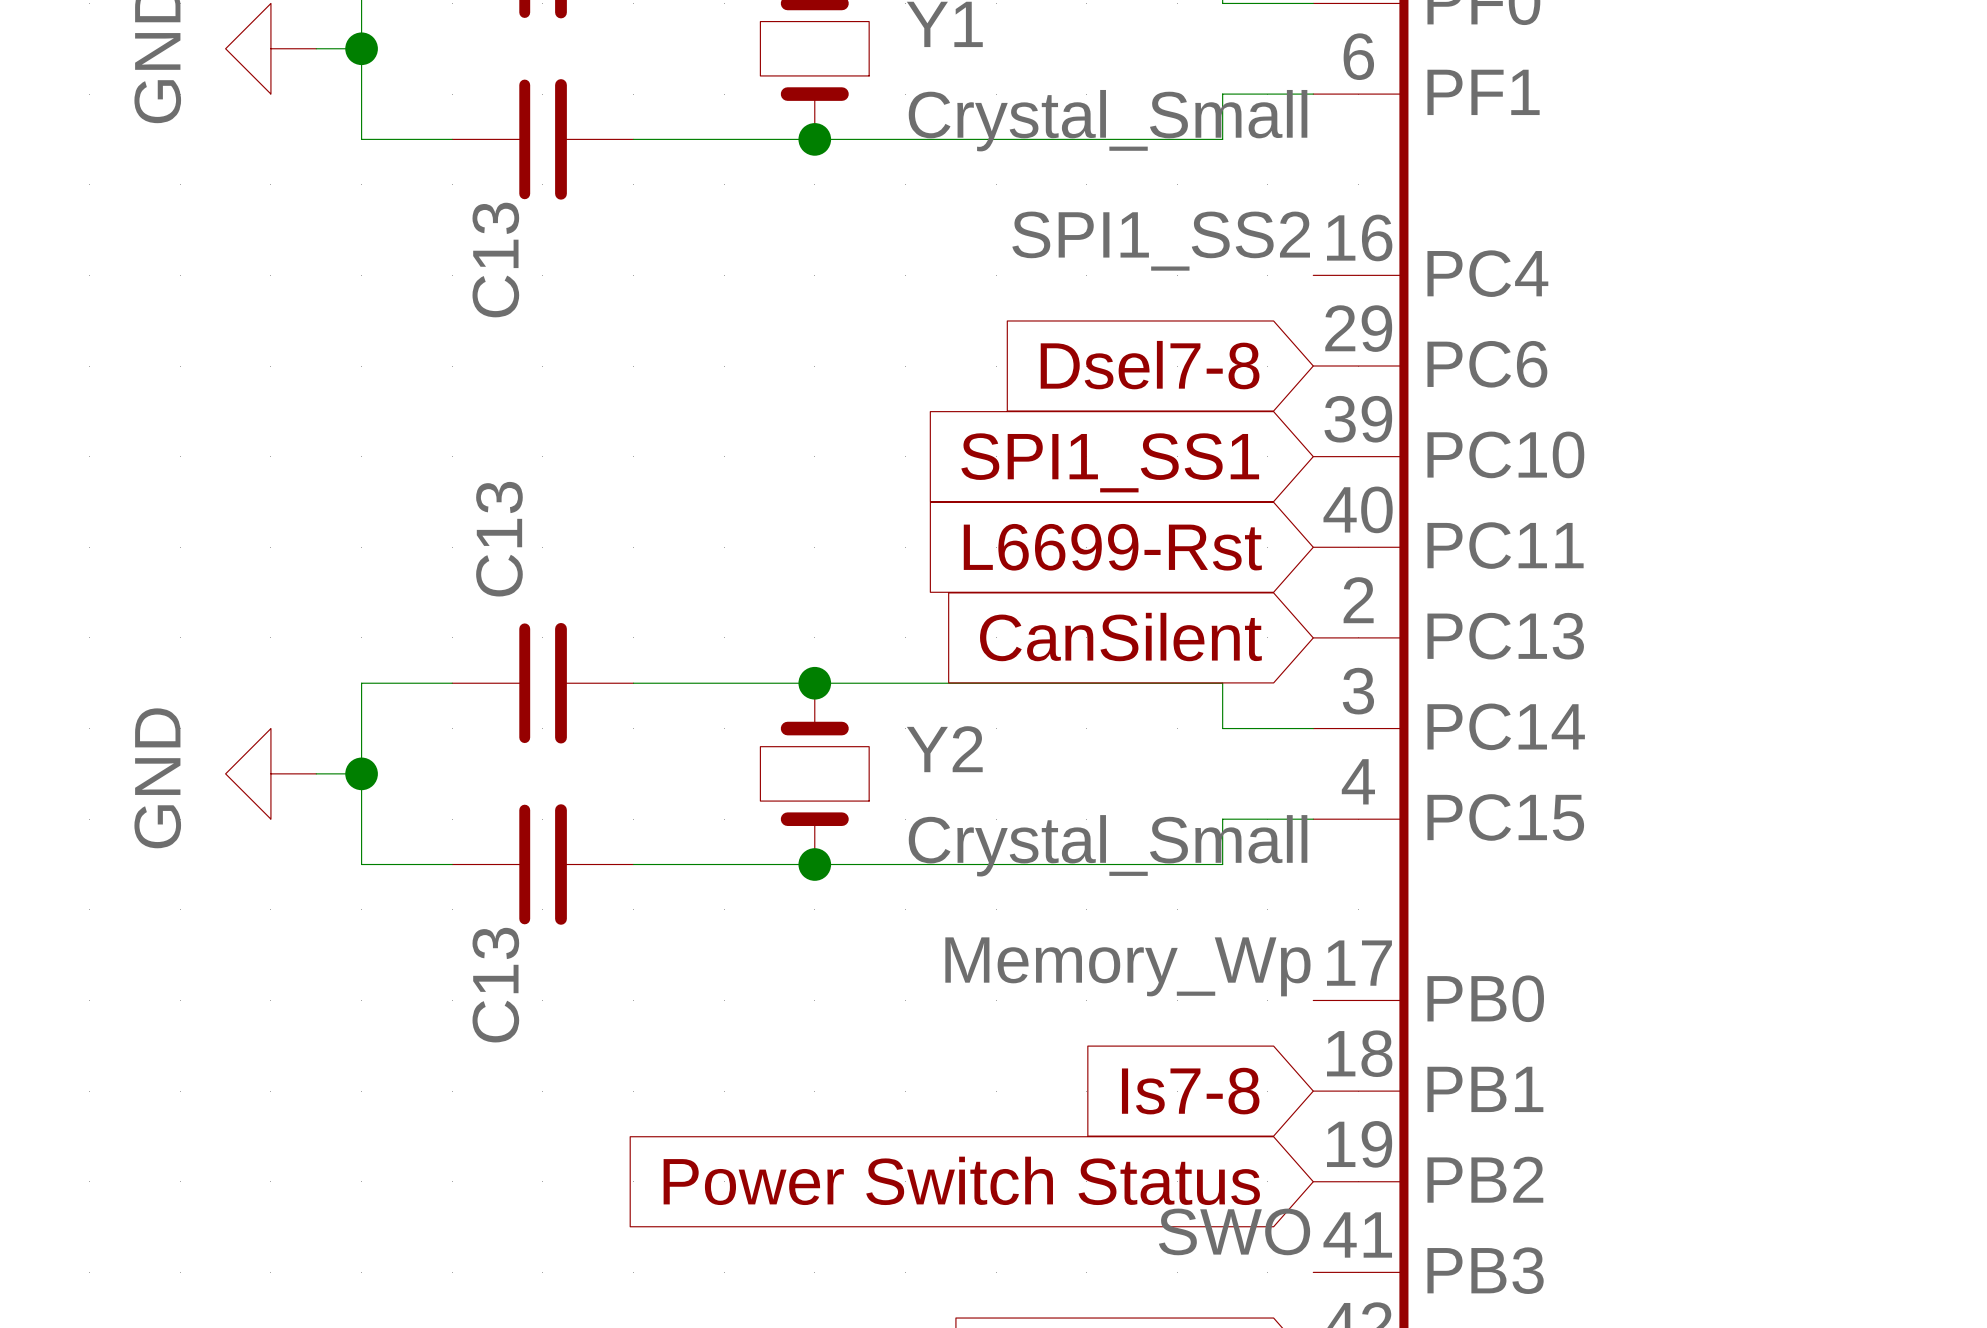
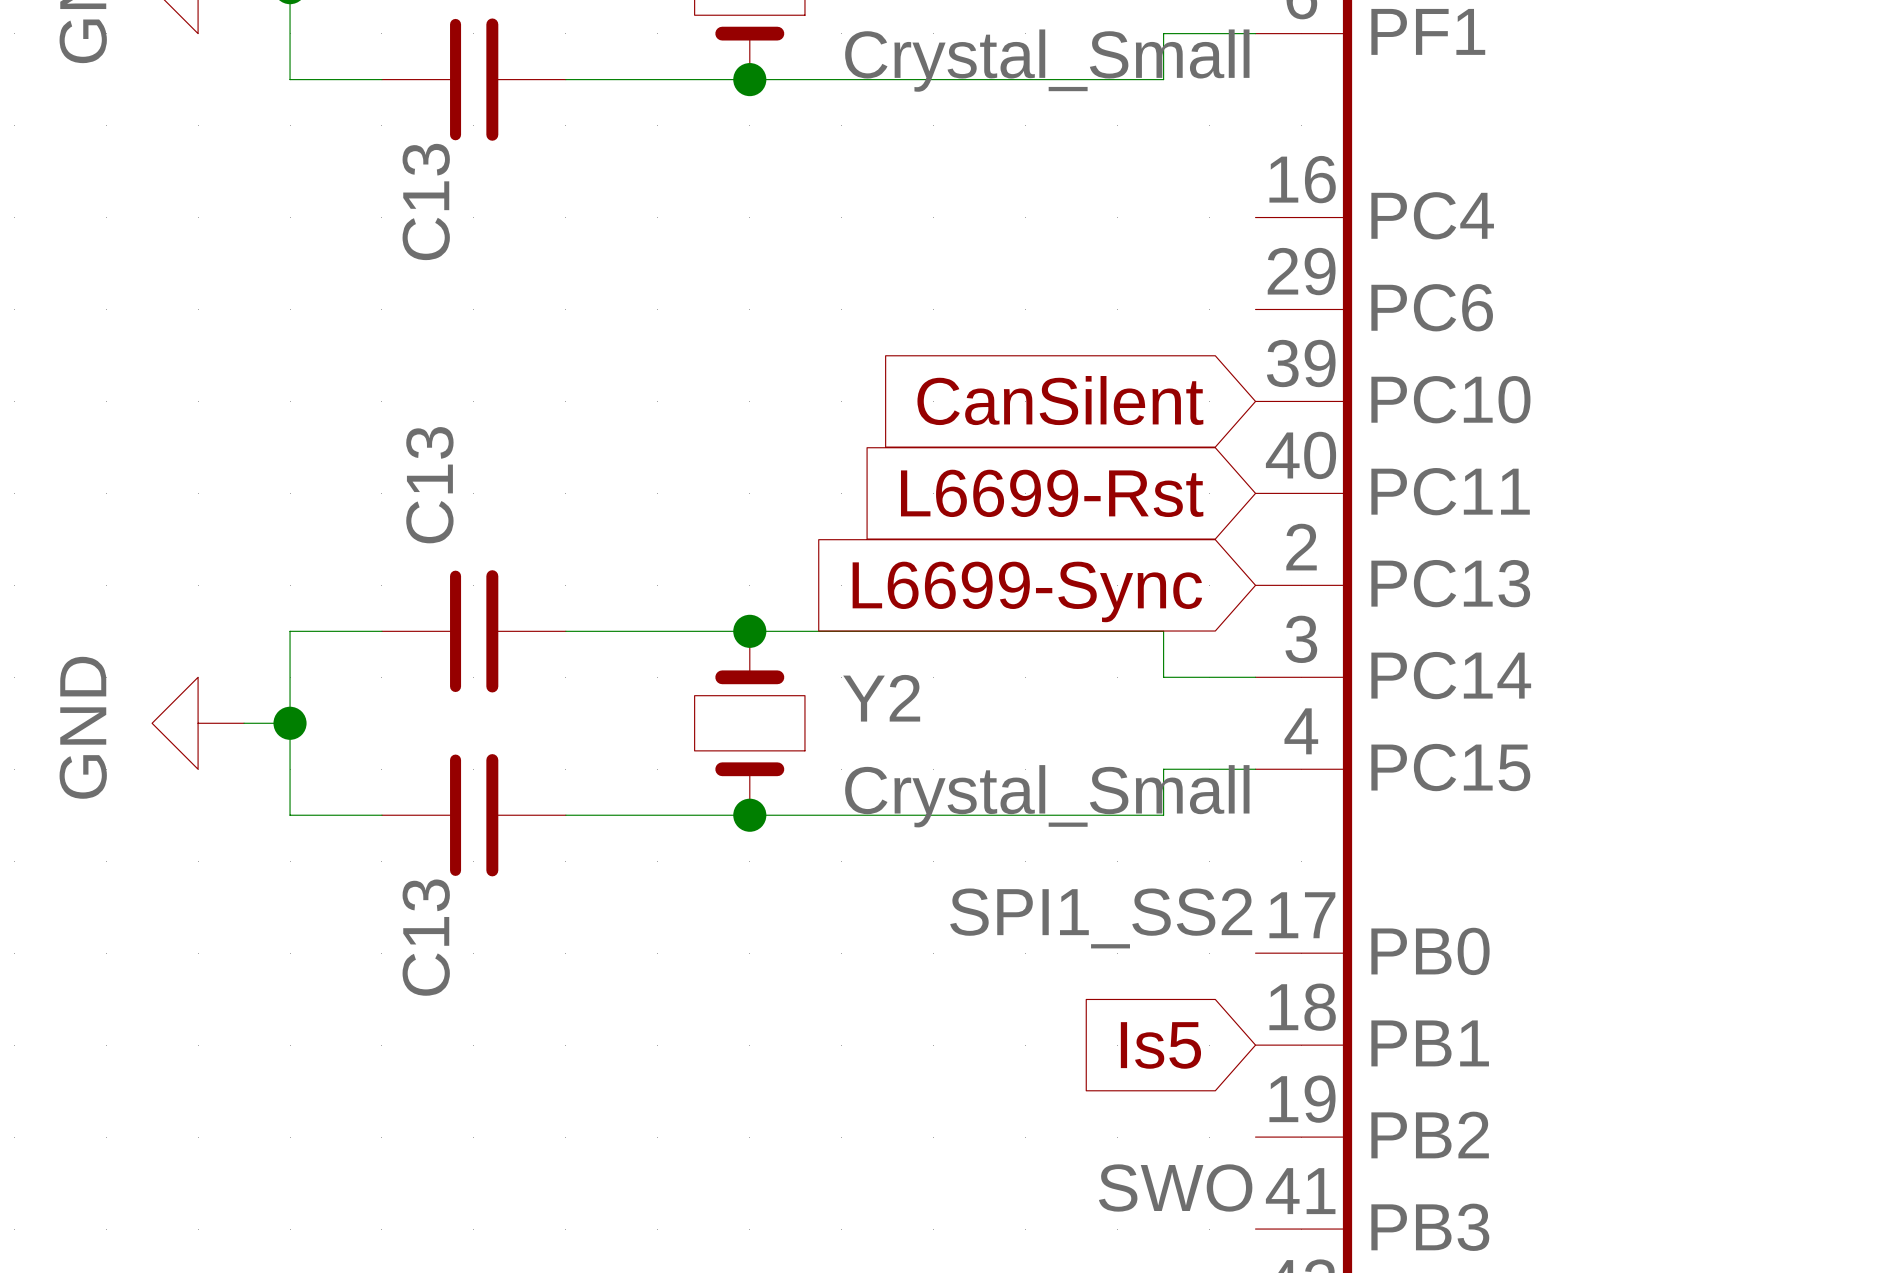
label: SPI1_SS2 (1161, 241) -> none
global label: Dsel7-8 (1150, 365) -> none
global label: SPI1_SS1 (1110, 462) -> CanSilent (1060, 400)
global label: CanSilent (1120, 637) -> L6699-Sync (1027, 591)
label: Memory_Wp (1127, 966) -> SPI1_SS2 (1101, 918)
global label: Is7-8 (1190, 1091) -> Is5 (1160, 1045)
global label: Power Switch Status (961, 1180) -> none

